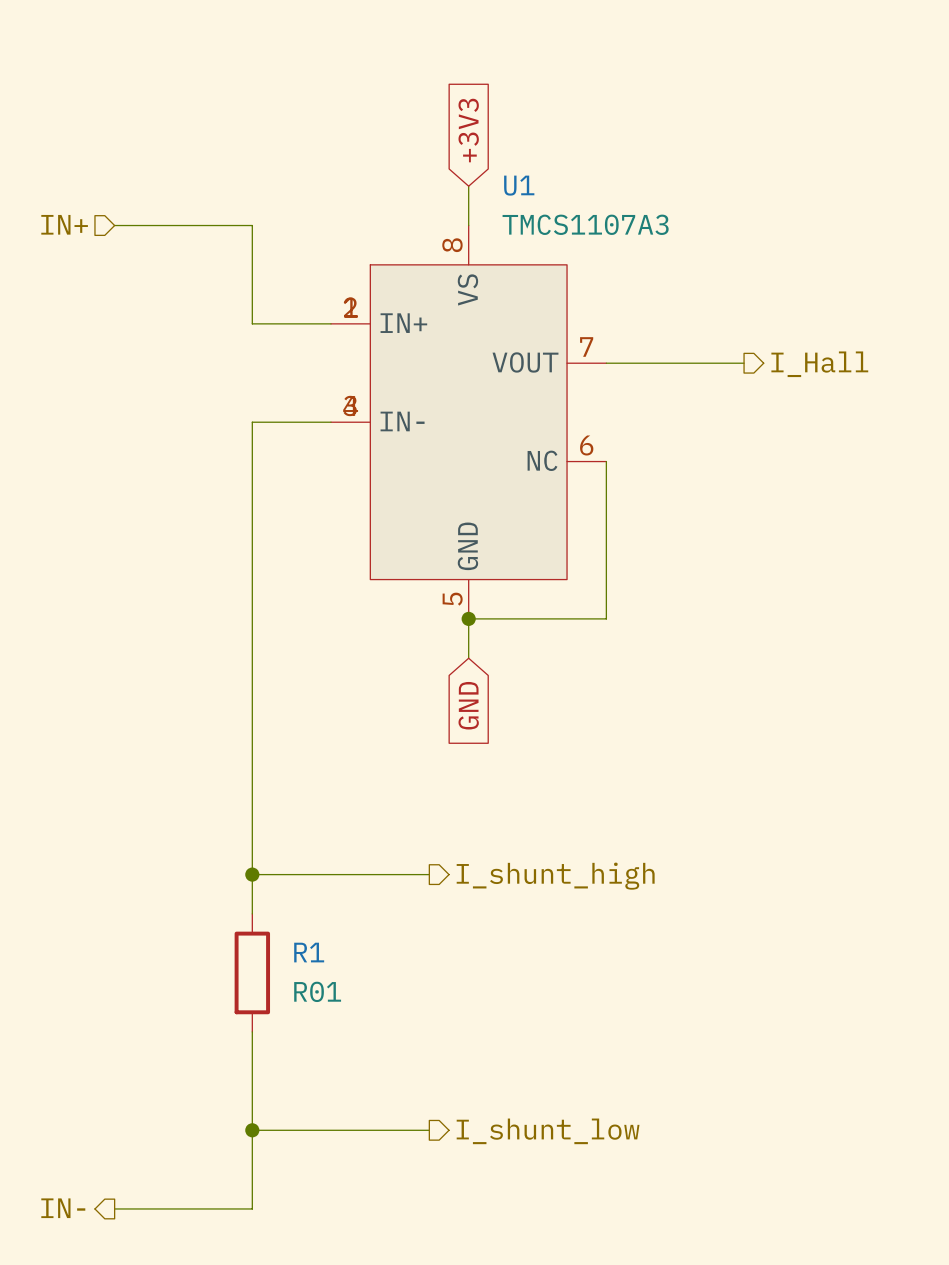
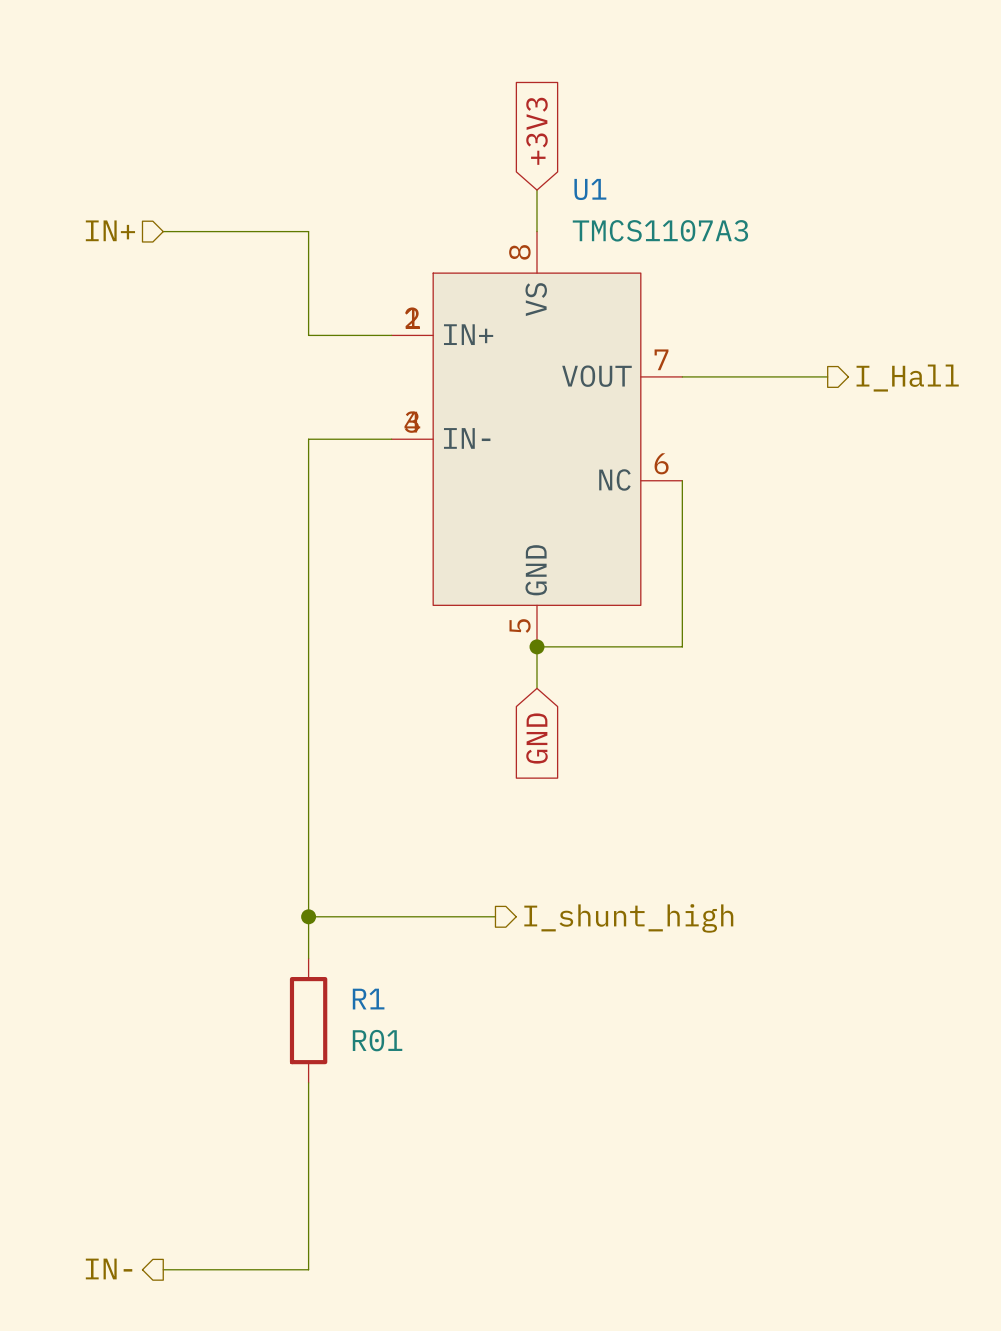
wire: (252, 1130) (429, 1130) -> none
junction: (252, 1130) -> none
hierarchical label: I_shunt_low (548, 1131) -> none

